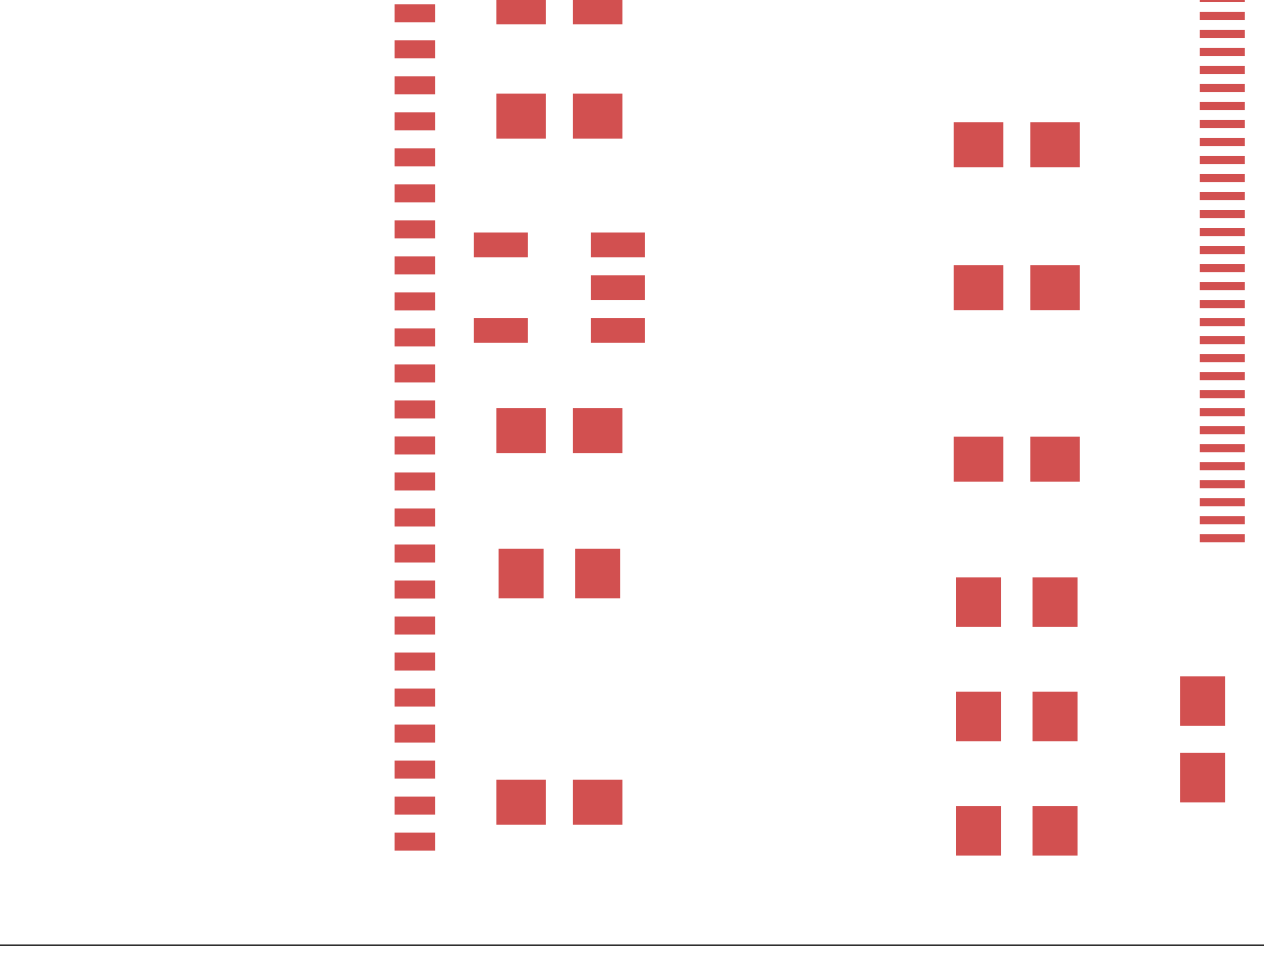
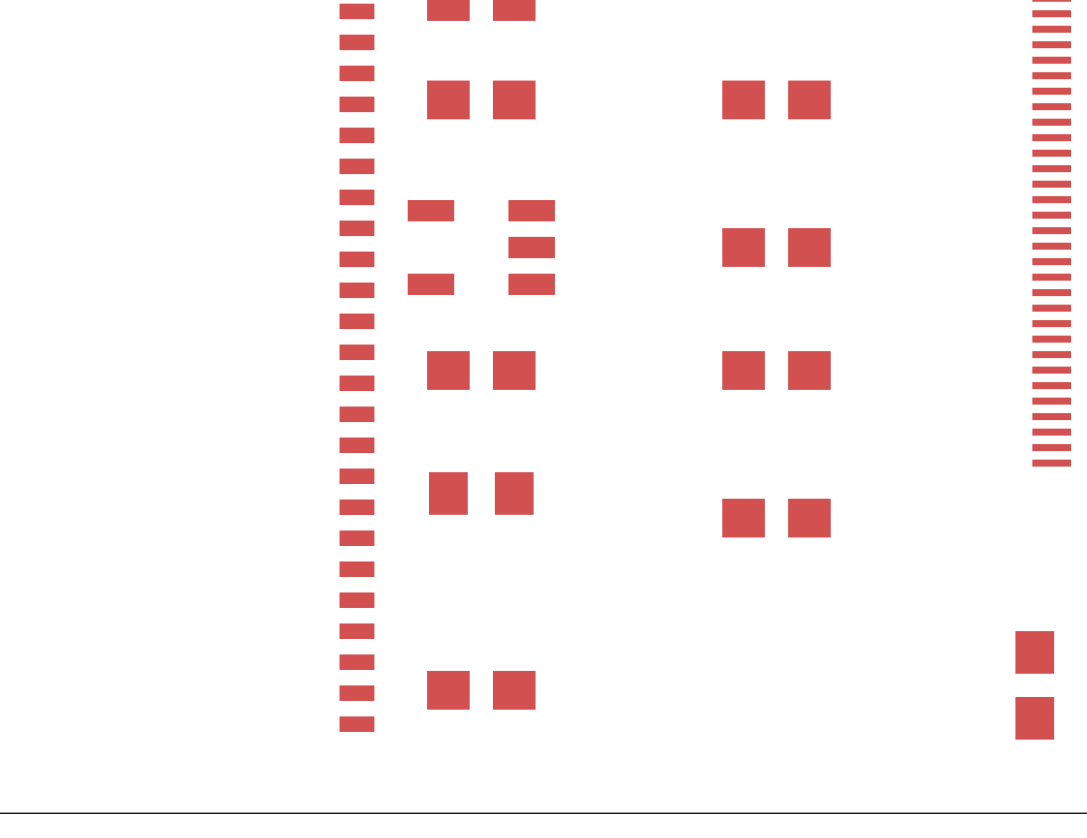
part: none -> (776, 99)
part: (1016, 144) -> none
part: none -> (776, 247)
part: (1016, 287) -> none
part: none -> (776, 370)
part: (1016, 459) -> none
part: none -> (776, 518)
part: (1016, 602) -> none
part: (1016, 716) -> none
part position: (1202, 739) -> (1034, 685)
part: (1016, 830) -> none

